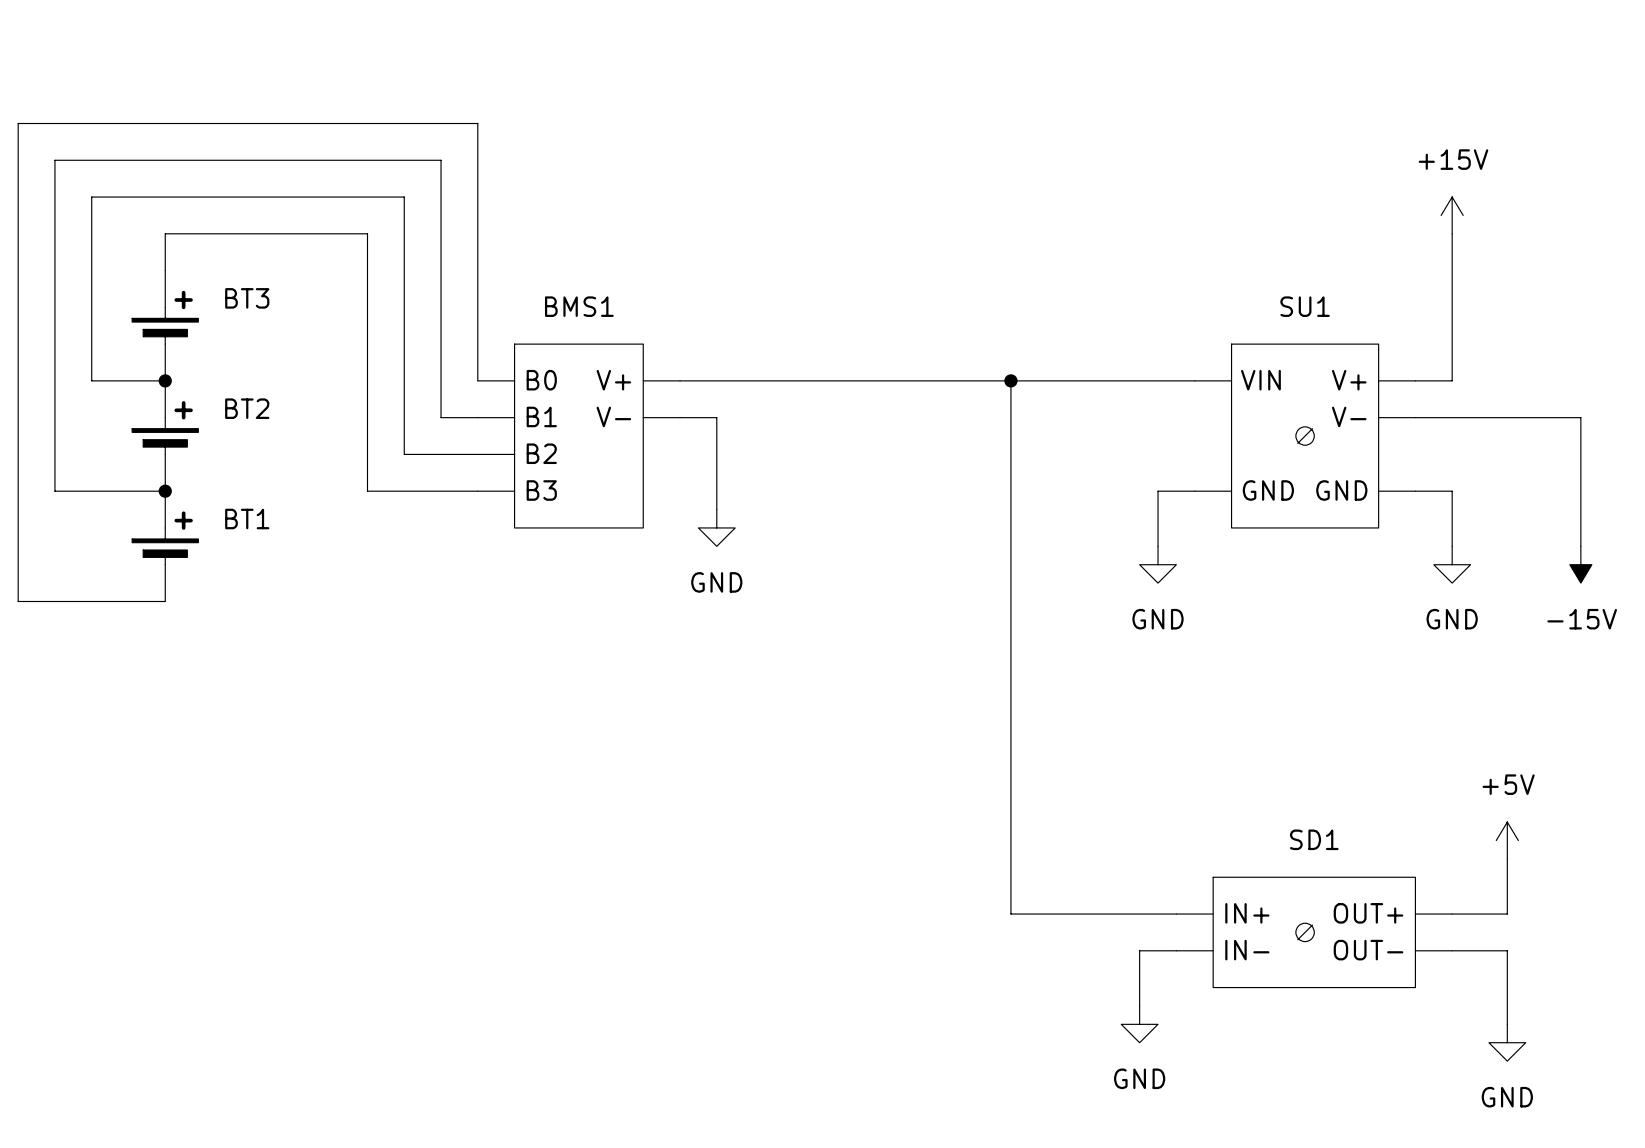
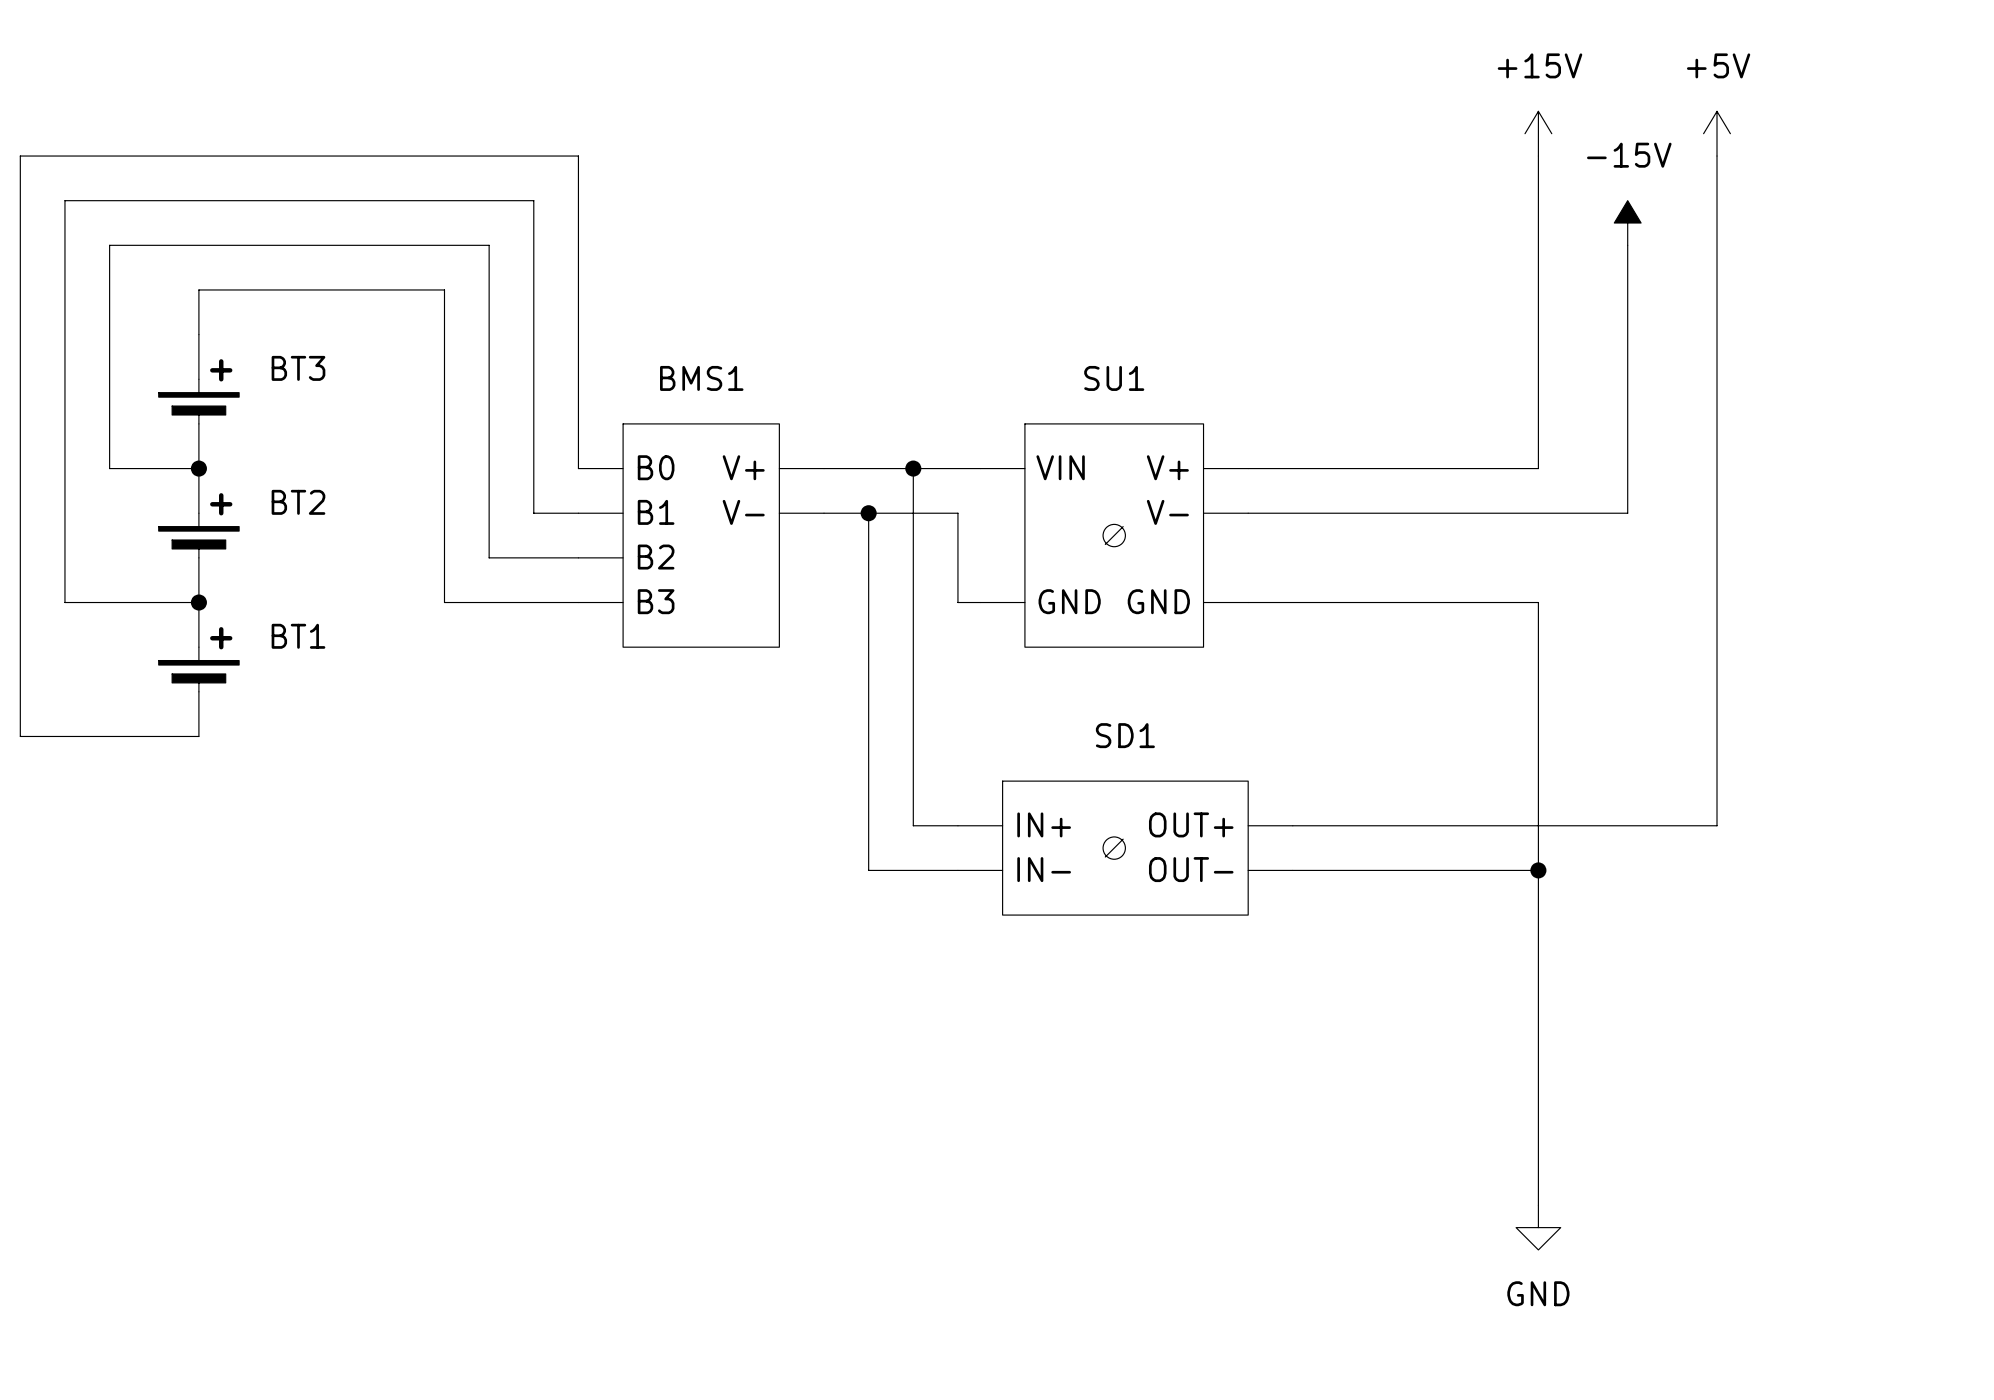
power symbol: none -> +5V (1717, 133)
wire: none -> (1538, 156) (1538, 468) (1449, 468)
wire: none -> (1717, 156) (1717, 825) (1292, 825)
power symbol: none -> -15V (1627, 223)
wire: none -> (1627, 245) (1627, 513) (1248, 513)
power symbol position: +15V (1452, 215) -> +15V (1538, 133)
wire: (1452, 233) (1452, 380) (1415, 380) -> none
wire: none -> (913, 468) (913, 825) (957, 825)
junction: none -> (913, 468)
wire: (808, 380) (1029, 380) -> none
wire: (1010, 380) (1010, 914) (1176, 914) -> none
junction: (1010, 380) -> none
wire: none -> (868, 513) (957, 513) (957, 602) (980, 602)
junction: none -> (868, 513)
wire: (1415, 417) (1580, 417) (1580, 546) -> none
SU1 position: (1305, 436) -> (1114, 535)
wire: (1158, 491) (1158, 546) -> (1404, 602) (1248, 602)
wire: none -> (1449, 602) (1538, 602) (1538, 1205)
wire: (1415, 491) (1452, 491) (1452, 546) -> none
wire: none -> (868, 624) (868, 870) (957, 870)
power symbol: GND (716, 527) -> none
power symbol: GND (1158, 564) -> none
power symbol: GND (1452, 564) -> none
power symbol: -15V (1580, 564) -> none
wire: none -> (1292, 870) (1538, 870)
junction: none -> (1538, 870)
power symbol: +5V (1507, 840) -> none
wire: (1507, 858) (1507, 914) (1452, 914) -> none
SD1 position: (1314, 932) -> (1125, 848)
wire: (1176, 950) (1139, 950) (1139, 1005) -> none
wire: (1452, 950) (1507, 950) (1507, 1024) -> none
power symbol: none -> GND (1538, 1227)
power symbol: GND (1139, 1024) -> none
power symbol: GND (1507, 1042) -> none

